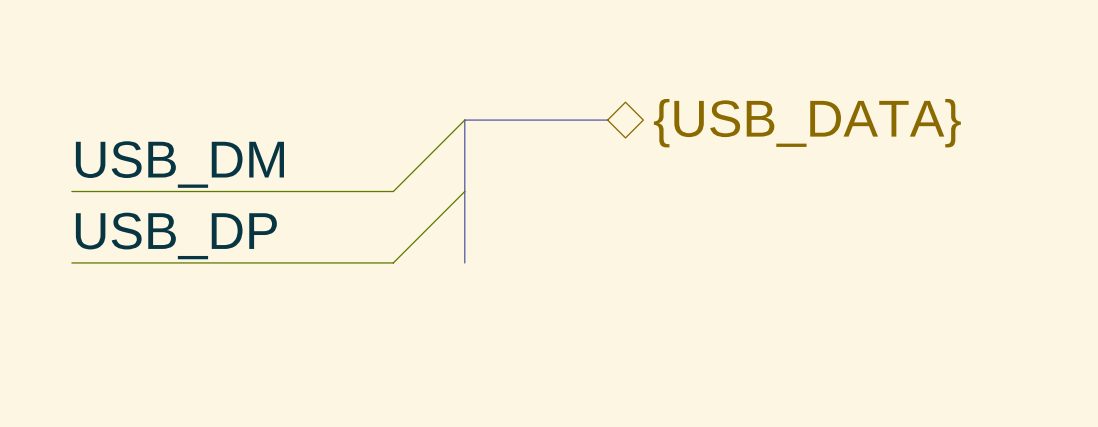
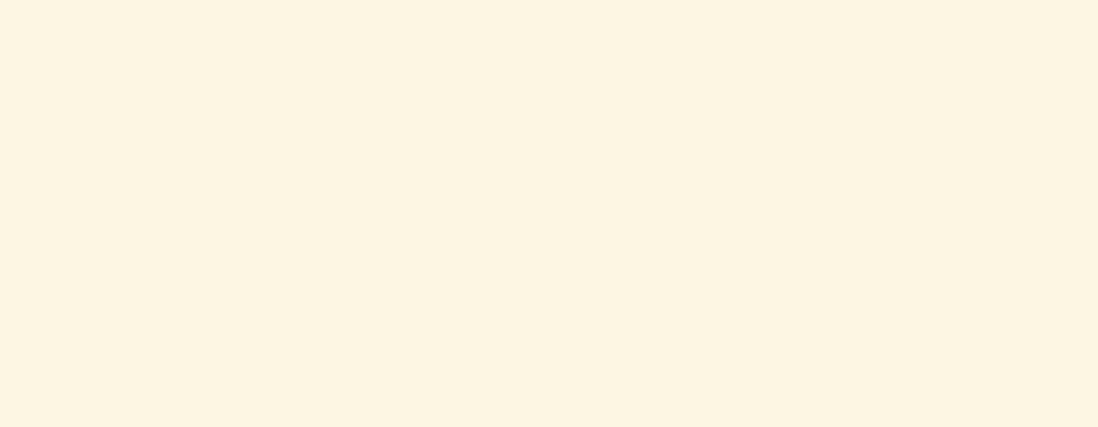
wire: (464, 120) (393, 191) (71, 191) -> none
bus: (607, 120) (464, 120) (464, 262) -> none
hierarchical label: {USB_DATA} (807, 123) -> none
label: USB_DM (179, 164) -> none
wire: (464, 191) (393, 262) (71, 262) -> none
label: USB_DP (176, 235) -> none

